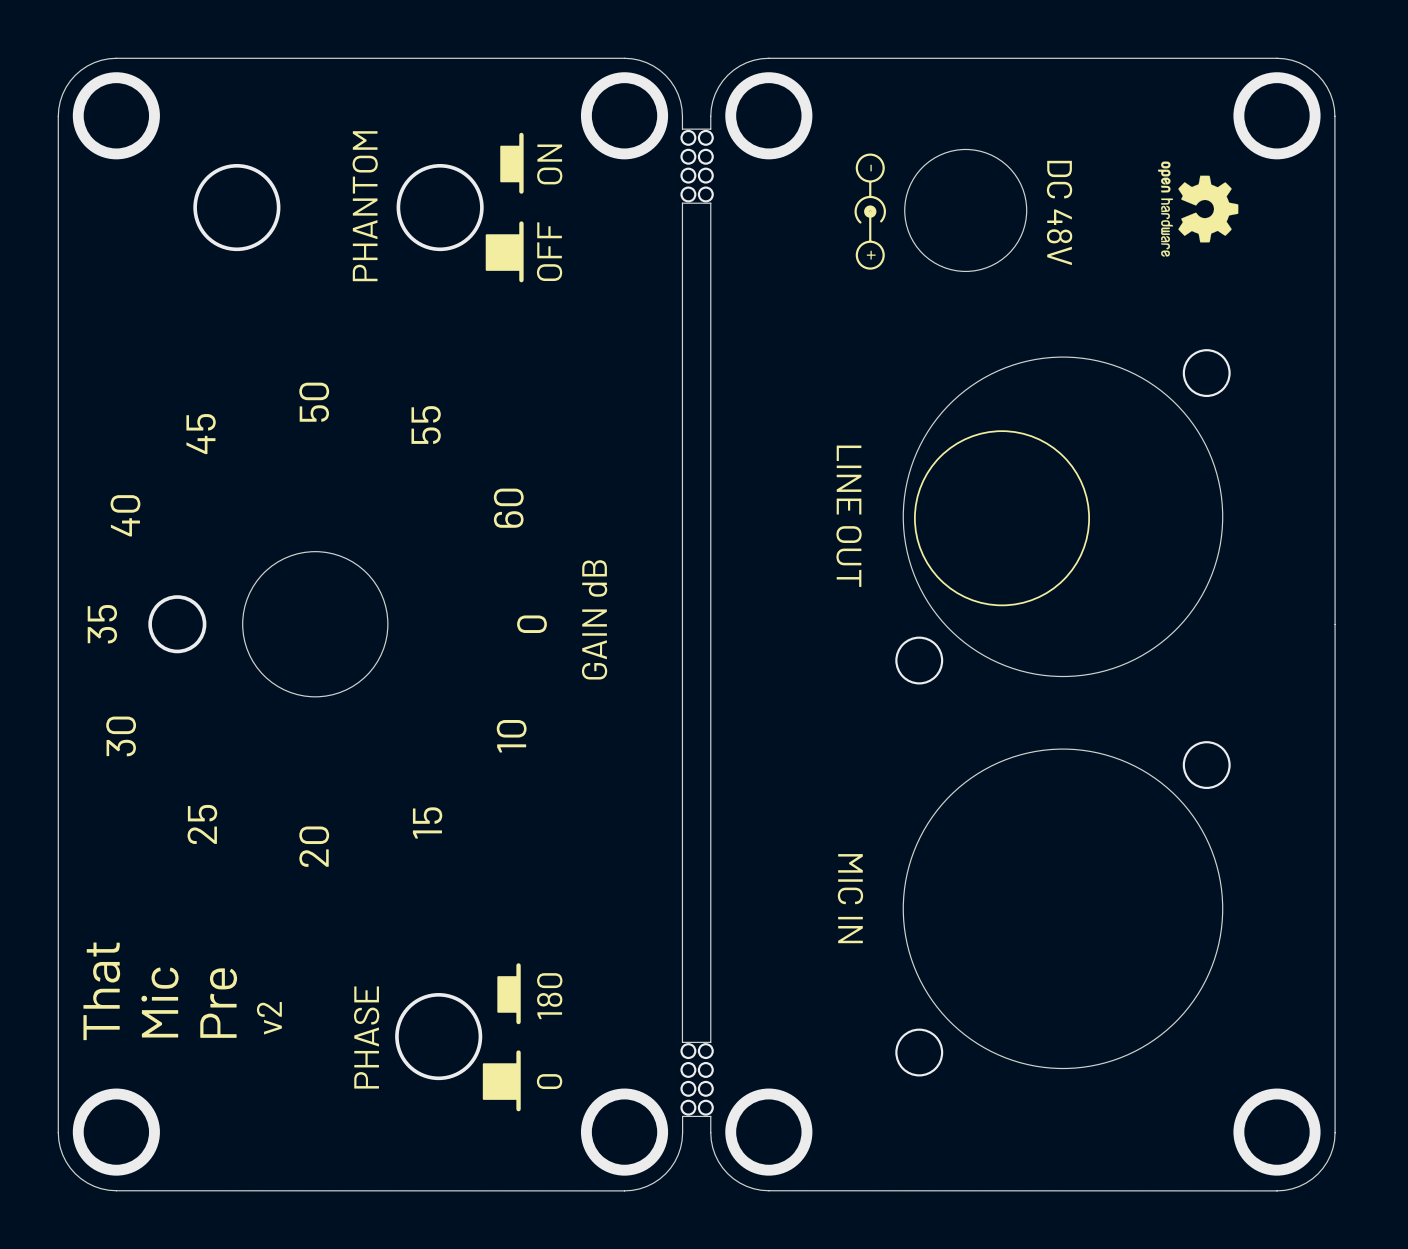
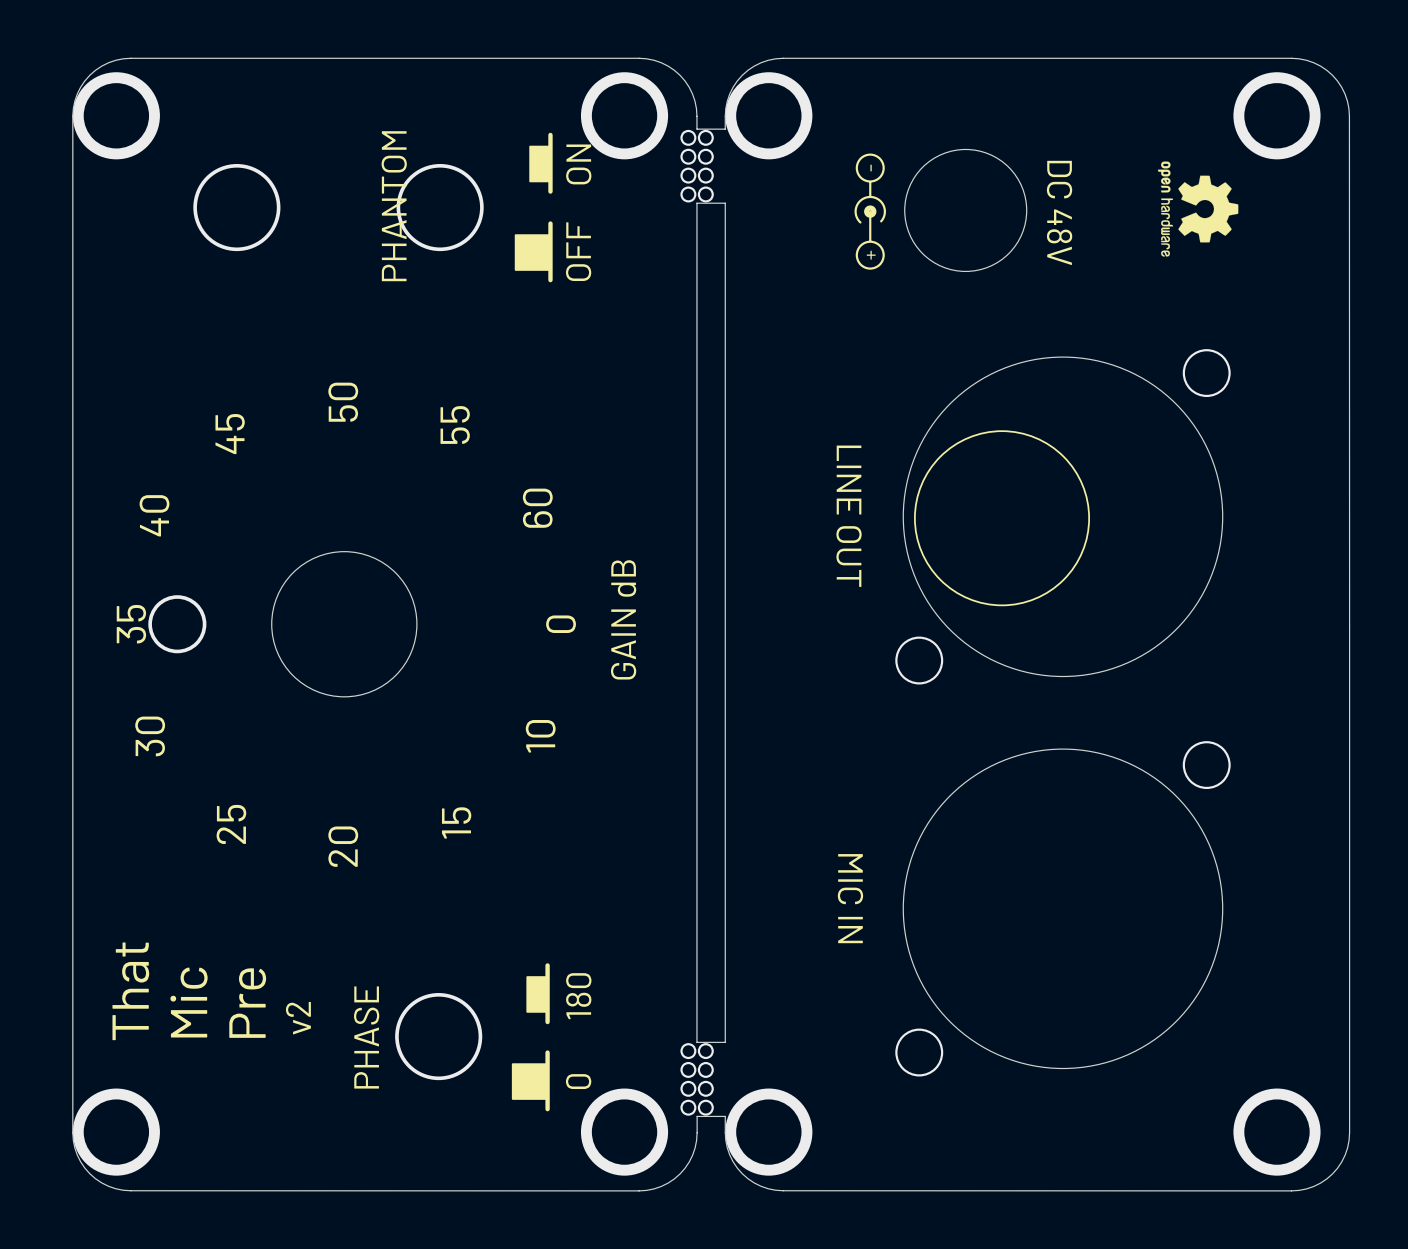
board edge: (130, 58) (101, 60) (81, 70) (66, 87) (60, 101) (58, 116) (58, 1140) (66, 1161) (81, 1178) (101, 1188) (130, 1190) -> (130, 58) (108, 62) (89, 75) (77, 94) (72, 116) (72, 1132) (77, 1154) (89, 1173) (108, 1186) (130, 1190)
board edge: (624, 58) (646, 62) (665, 75) (674, 87) (680, 101) (682, 129) (696, 129) -> (624, 58) (654, 60) (668, 66) (680, 75) (689, 87) (695, 101) (696, 129)
board edge: (783, 58) (753, 60) (739, 66) (727, 75) (718, 87) (712, 101) (710, 129) -> (783, 58) (761, 62) (742, 75) (733, 87) (727, 101) (725, 129) (710, 129)
board edge: (1276, 58) (1299, 62) (1317, 75) (1330, 94) (1334, 108) (1335, 624) (1334, 1140) (1330, 1155) (1318, 1173) (1299, 1186) (1276, 1190) -> (1276, 58) (1306, 60) (1326, 70) (1341, 87) (1348, 108) (1349, 624) (1349, 1140) (1341, 1161) (1326, 1178) (1306, 1188) (1276, 1190)
line: (521, 134) (521, 191) -> (550, 134) (550, 191)
drawing position: (510, 163) -> (539, 163)
text position: ON (549, 164) -> ON (578, 164)
board edge: (696, 203) (682, 203) (682, 1042) (696, 1042) -> (696, 203) (696, 1042)
board edge: (710, 203) (710, 1042) -> (710, 203) (725, 203) (725, 1042) (710, 1042)
text position: PHANTOM (365, 206) -> PHANTOM (394, 206)
line: (521, 223) (521, 280) -> (550, 223) (550, 280)
text position: OFF (549, 251) -> OFF (578, 251)
drawing position: (503, 252) -> (532, 252)
text position: 50 (314, 402) -> 50 (343, 402)
text position: 55 (426, 424) -> 55 (455, 425)
text position: 45 (201, 434) -> 45 (230, 434)
text position: 60 (508, 508) -> 60 (537, 508)
text position: 40 (125, 515) -> 40 (154, 515)
text position: GAIN dB (594, 619) -> GAIN dB (623, 619)
text position: 35 (102, 624) -> 35 (131, 624)
round board edge position: (315, 624) -> (344, 624)
text position: 0 (531, 624) -> 0 (561, 624)
text position: 30 (121, 736) -> 30 (150, 736)
text position: 10 (511, 736) -> 10 (540, 736)
text position: 15 (427, 822) -> 15 (456, 822)
text position: 25 (202, 824) -> 25 (231, 824)
text position: 20 (314, 846) -> 20 (343, 846)
line: (518, 965) (518, 1022) -> (547, 965) (547, 1022)
text position: That (101, 991) -> That (130, 991)
drawing position: (507, 994) -> (536, 994)
text position: 180 (549, 996) -> 180 (578, 996)
text position: Mic (159, 1002) -> Mic (189, 1002)
text position: Pre (218, 1003) -> Pre (247, 1003)
text position: v2 (269, 1018) -> v2 (298, 1018)
line: (518, 1052) (518, 1109) -> (547, 1052) (547, 1109)
drawing position: (500, 1081) -> (529, 1081)
text position: 0 (549, 1081) -> 0 (578, 1081)
board edge: (697, 1116) (682, 1116) (680, 1147) (674, 1161) (665, 1173) (646, 1186) (624, 1190) -> (697, 1116) (695, 1147) (689, 1161) (680, 1173) (668, 1183) (654, 1188) (624, 1190)
board edge: (710, 1116) (712, 1147) (718, 1161) (727, 1173) (739, 1182) (753, 1188) (783, 1190) -> (710, 1116) (725, 1116) (727, 1147) (733, 1161) (742, 1173) (761, 1186) (783, 1190)

